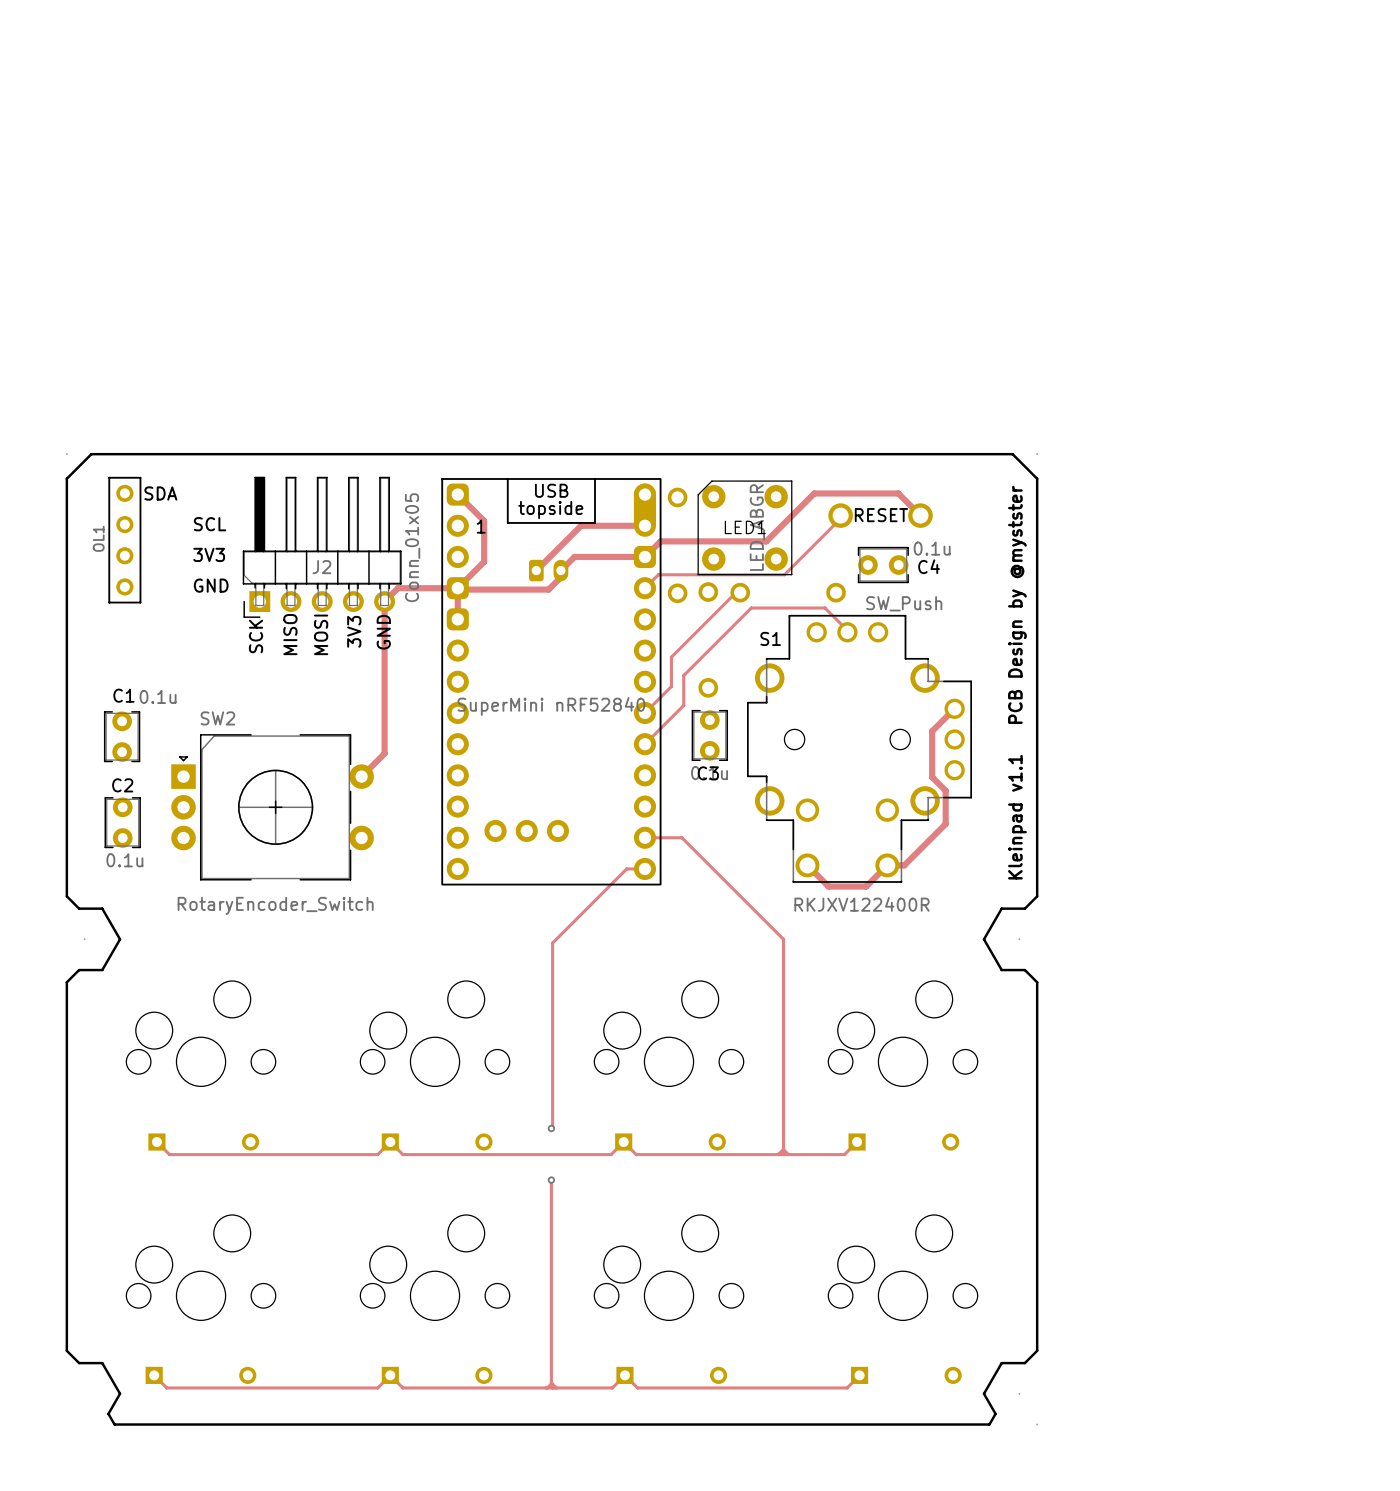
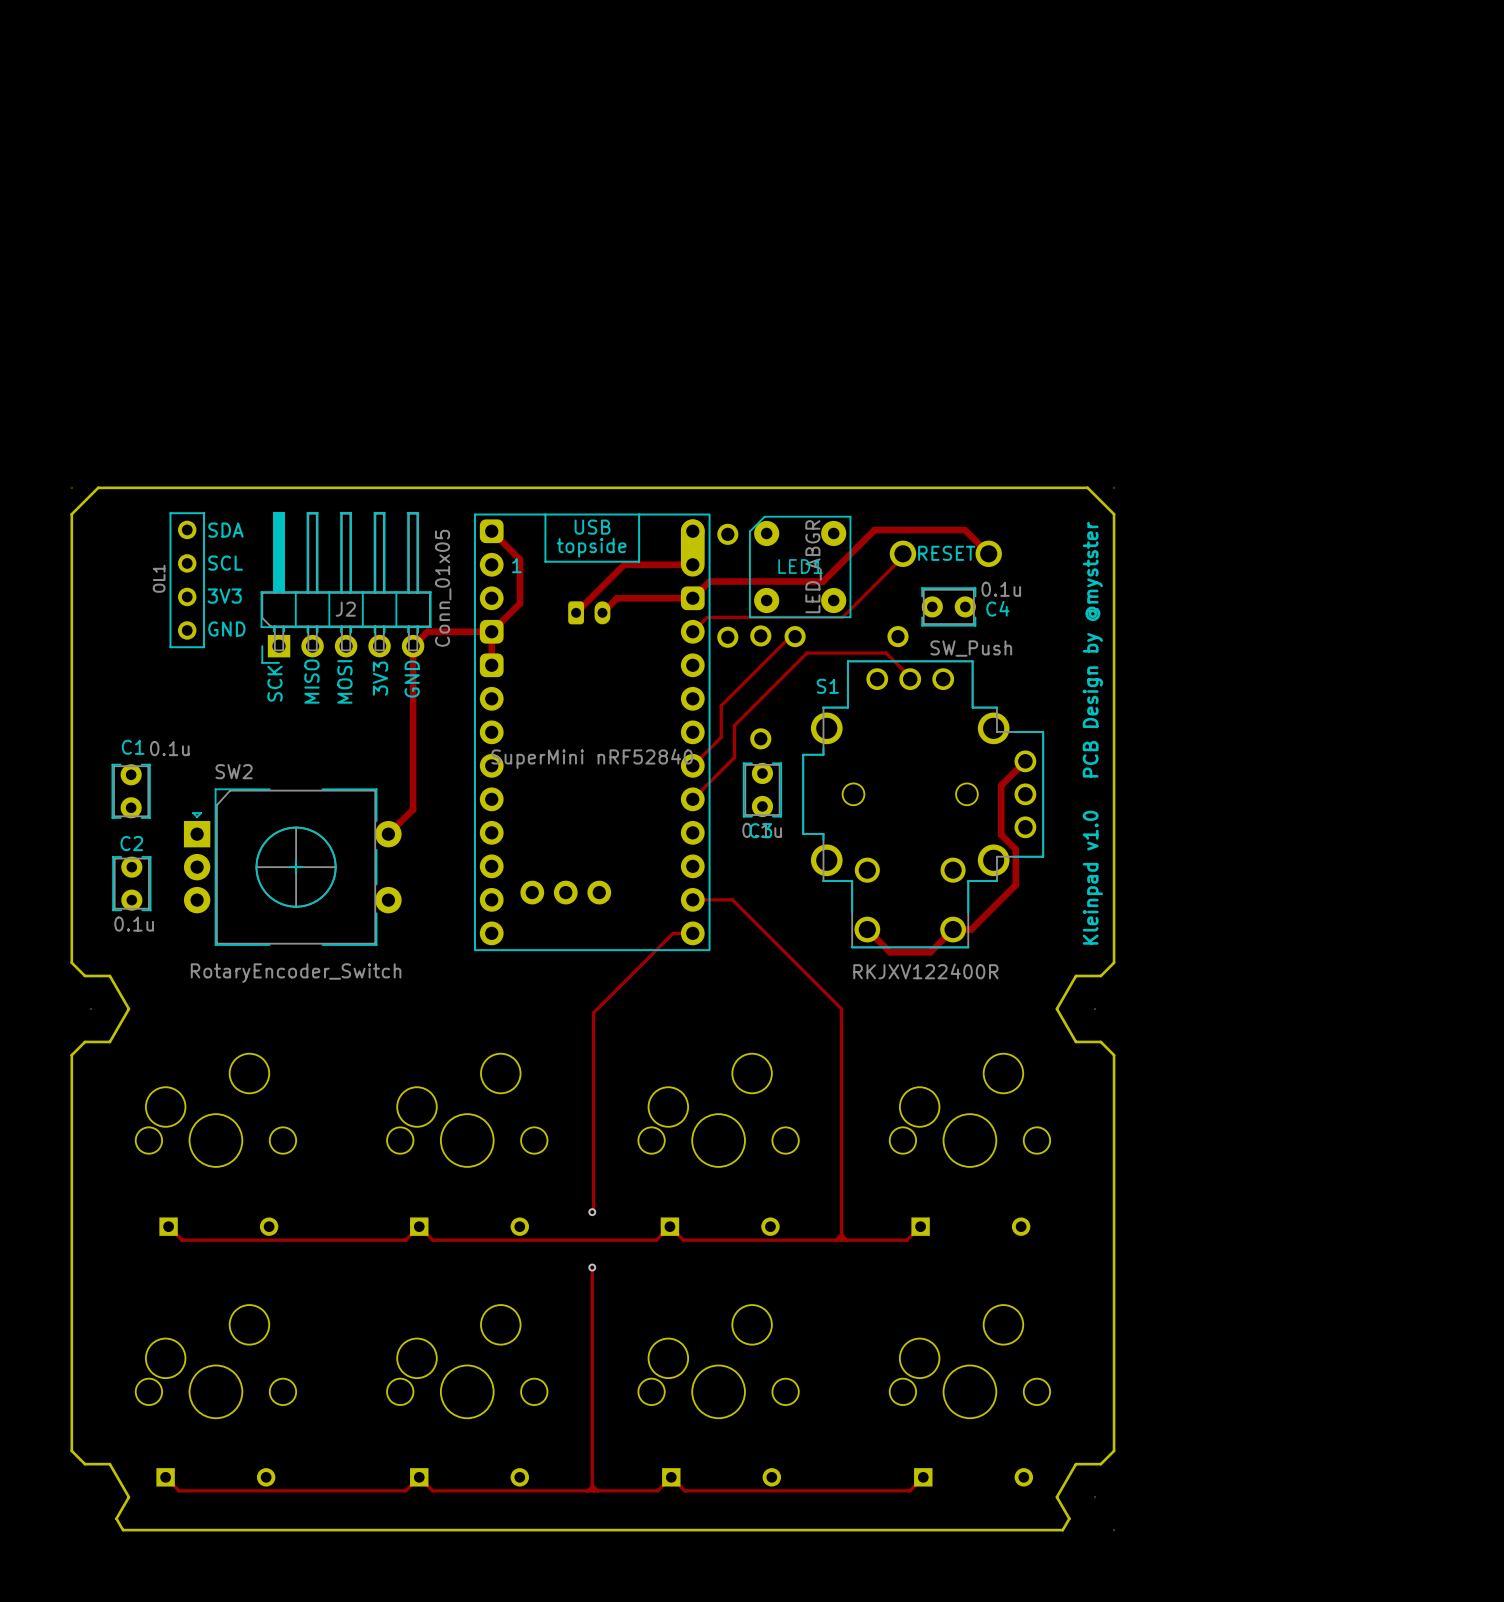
text position: SDA (160, 493) -> SDA (225, 530)
OL1 position: (124, 540) -> (187, 580)
track: (560, 570) (560, 577) (548, 589) (457, 588) -> none
text: Kleinpad v1.1 PCB Design by @mystster (1017, 682) -> Kleinpad v1.0 PCB Design by @mystster (1092, 733)

